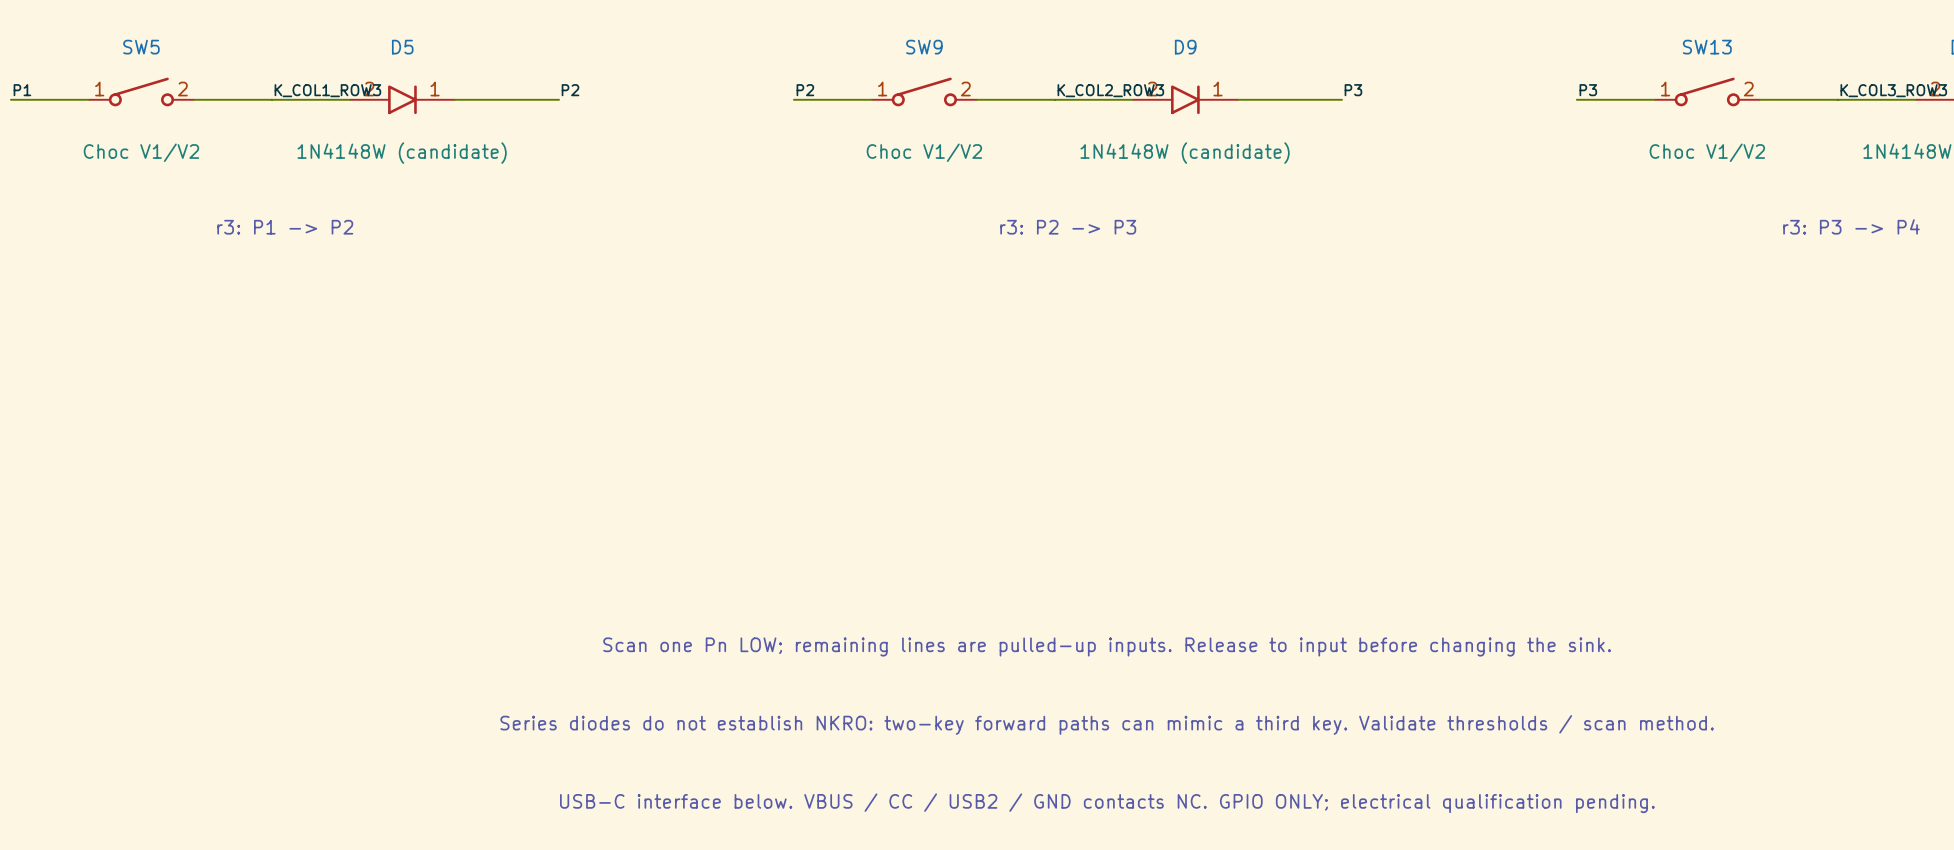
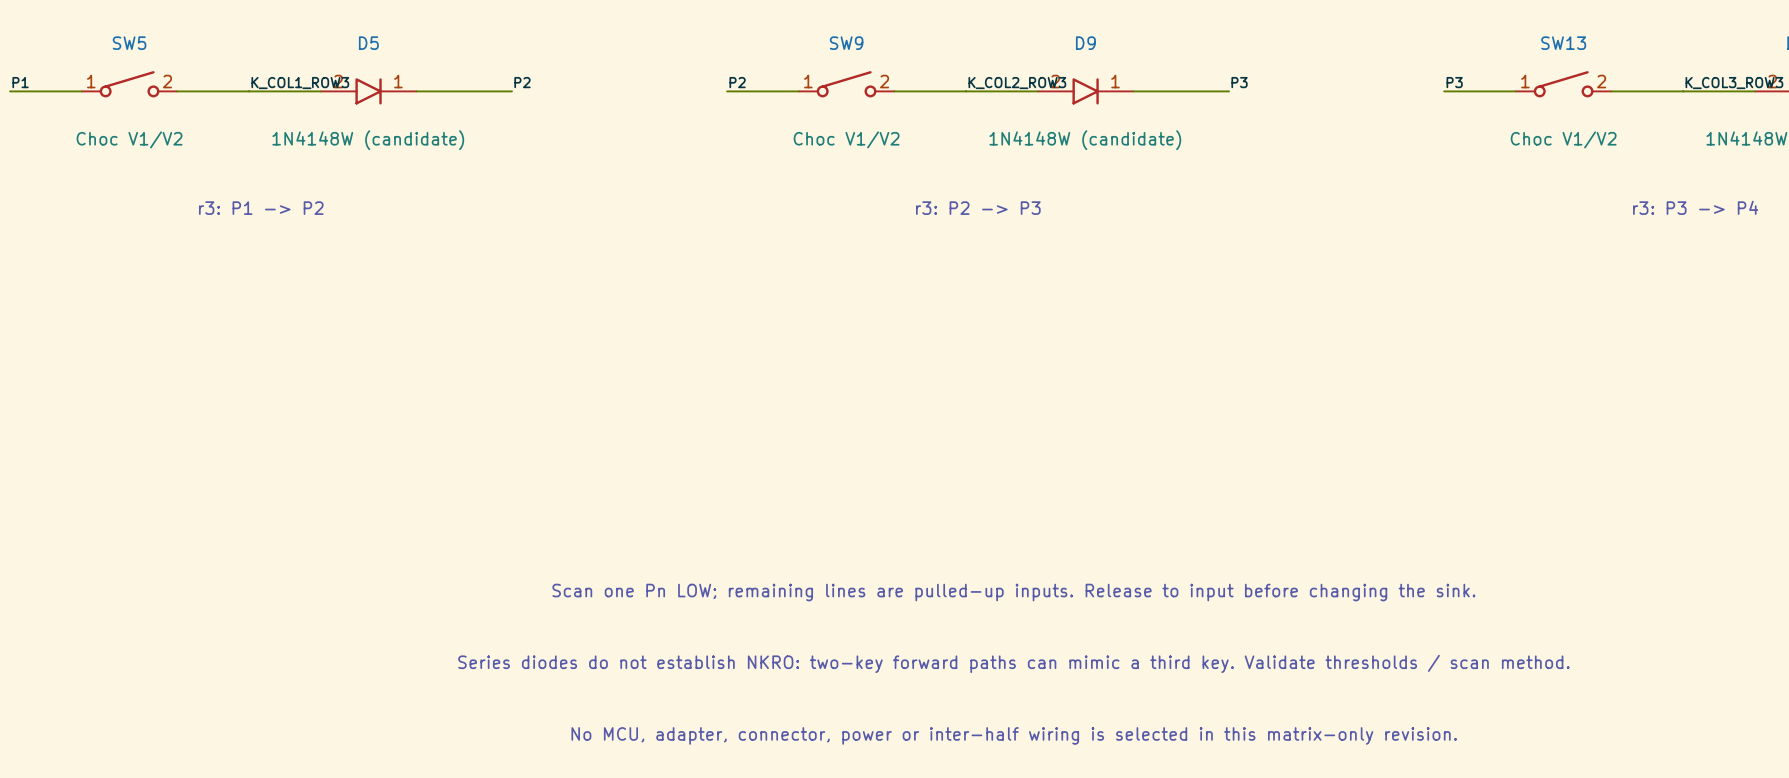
text: USB-C interface below. VBUS / CC / USB2 / GND contacts NC. GPIO ONLY; electrical qualification pending. (1107, 803) -> No MCU, adapter, connector, power or inter-half wiring is selected in this matrix-only revision. (1014, 735)

